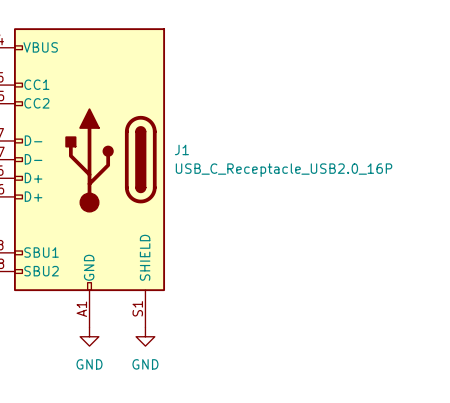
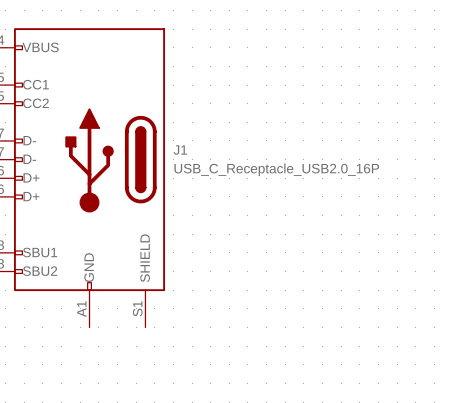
power symbol: GND (89, 336) -> none
power symbol: GND (145, 336) -> none

